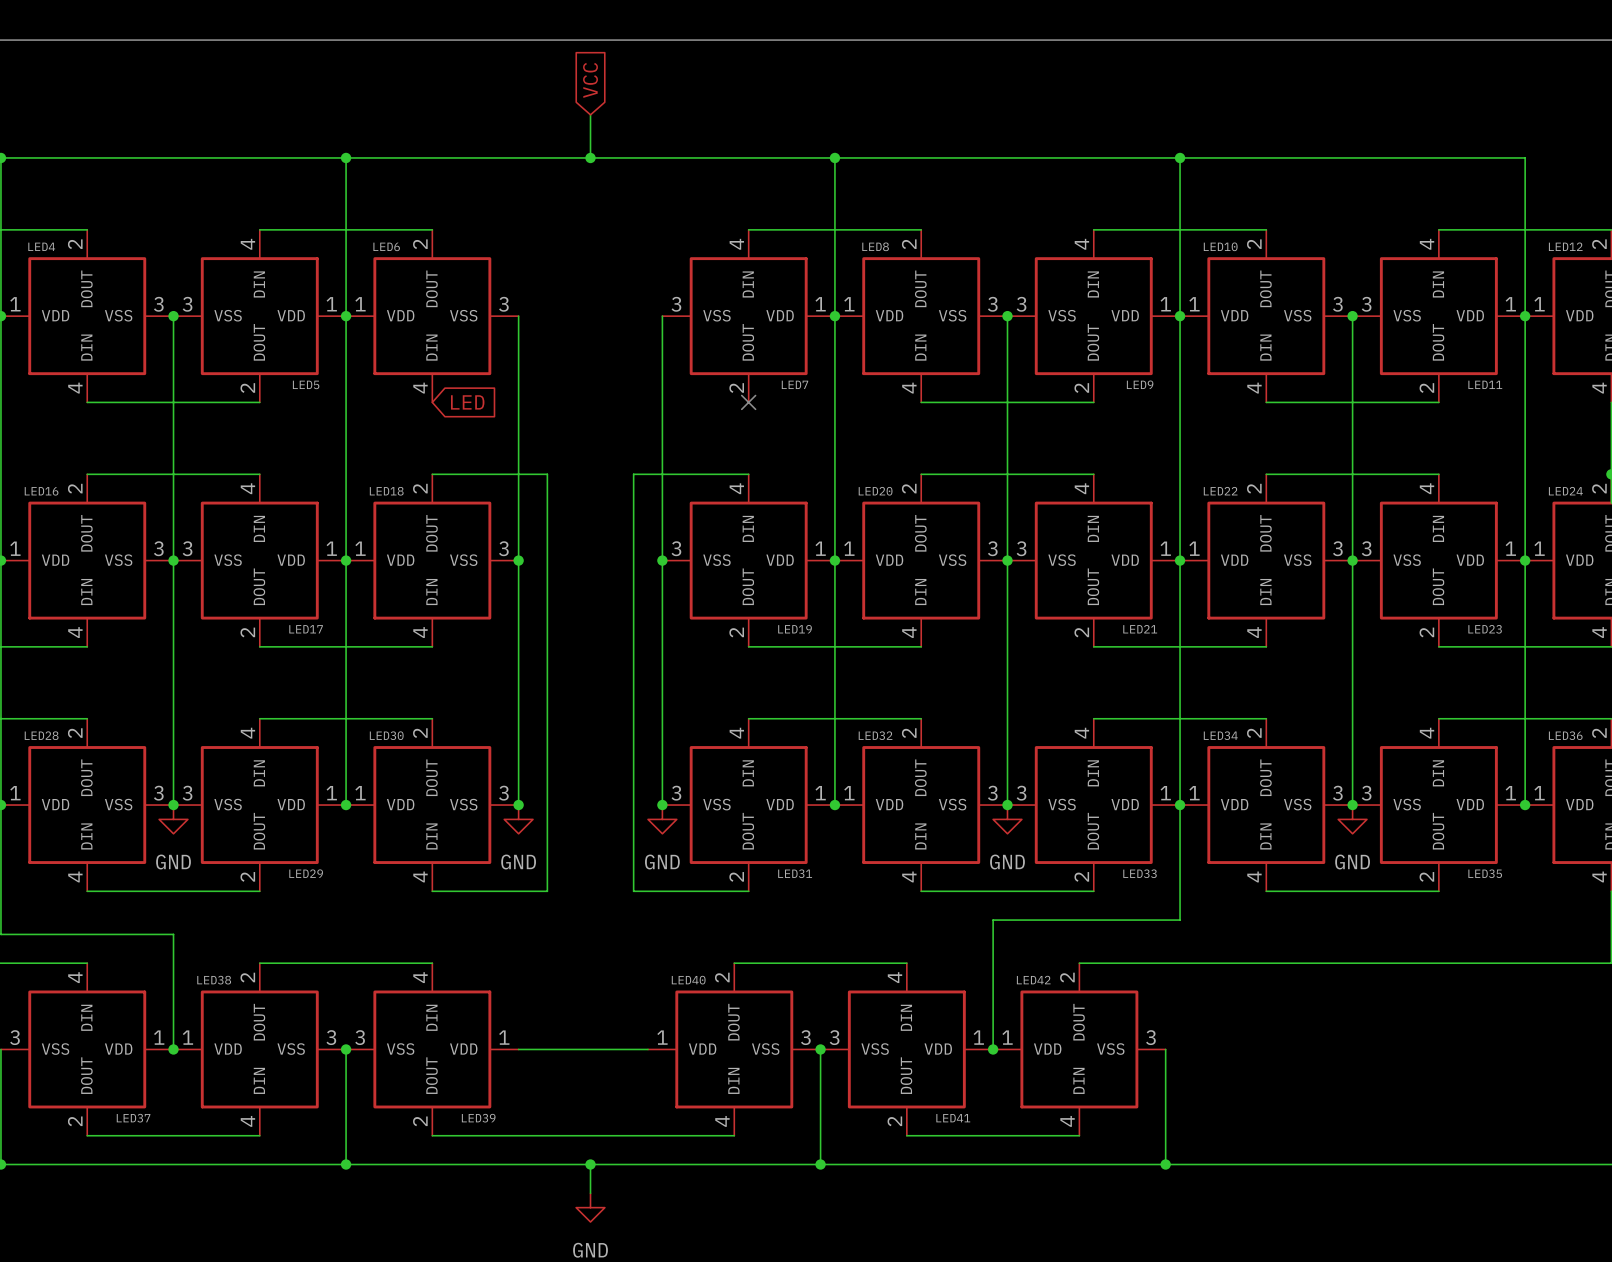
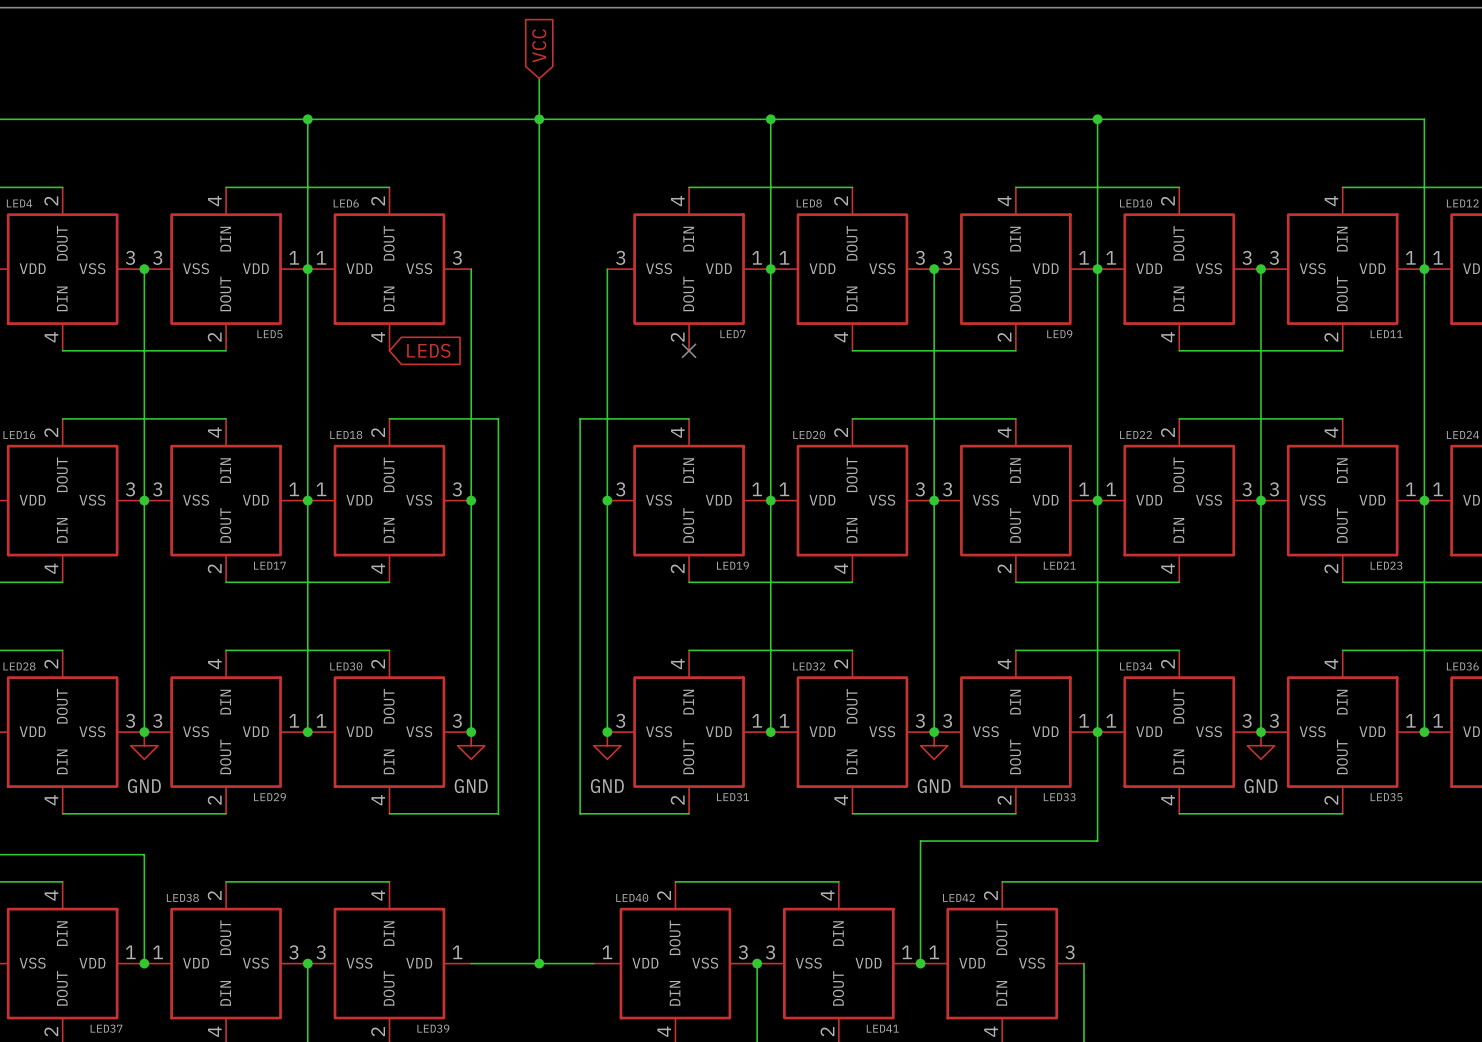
wire: none -> (539, 119) (539, 963)
global label: LED (467, 402) -> LEDS (428, 350)
junction: none -> (539, 963)

